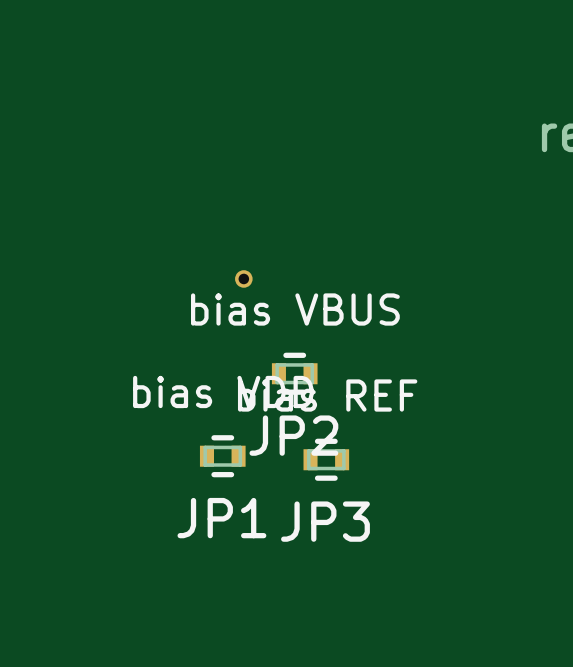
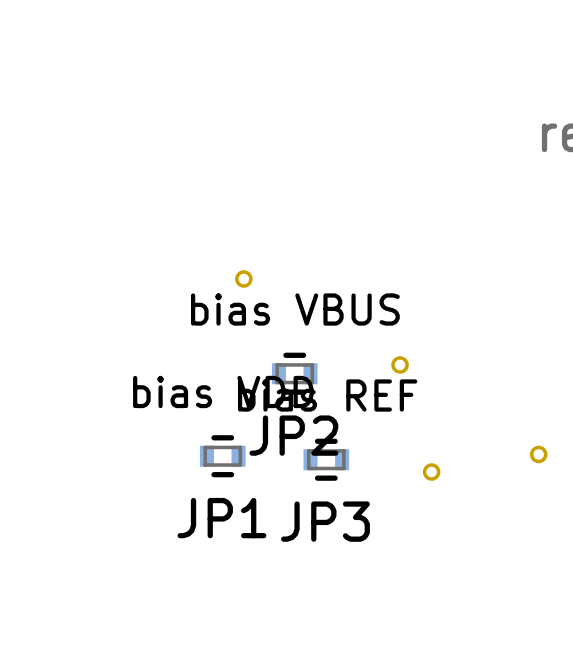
part: none -> (400, 364)
part: none -> (538, 454)
part: none -> (431, 472)

